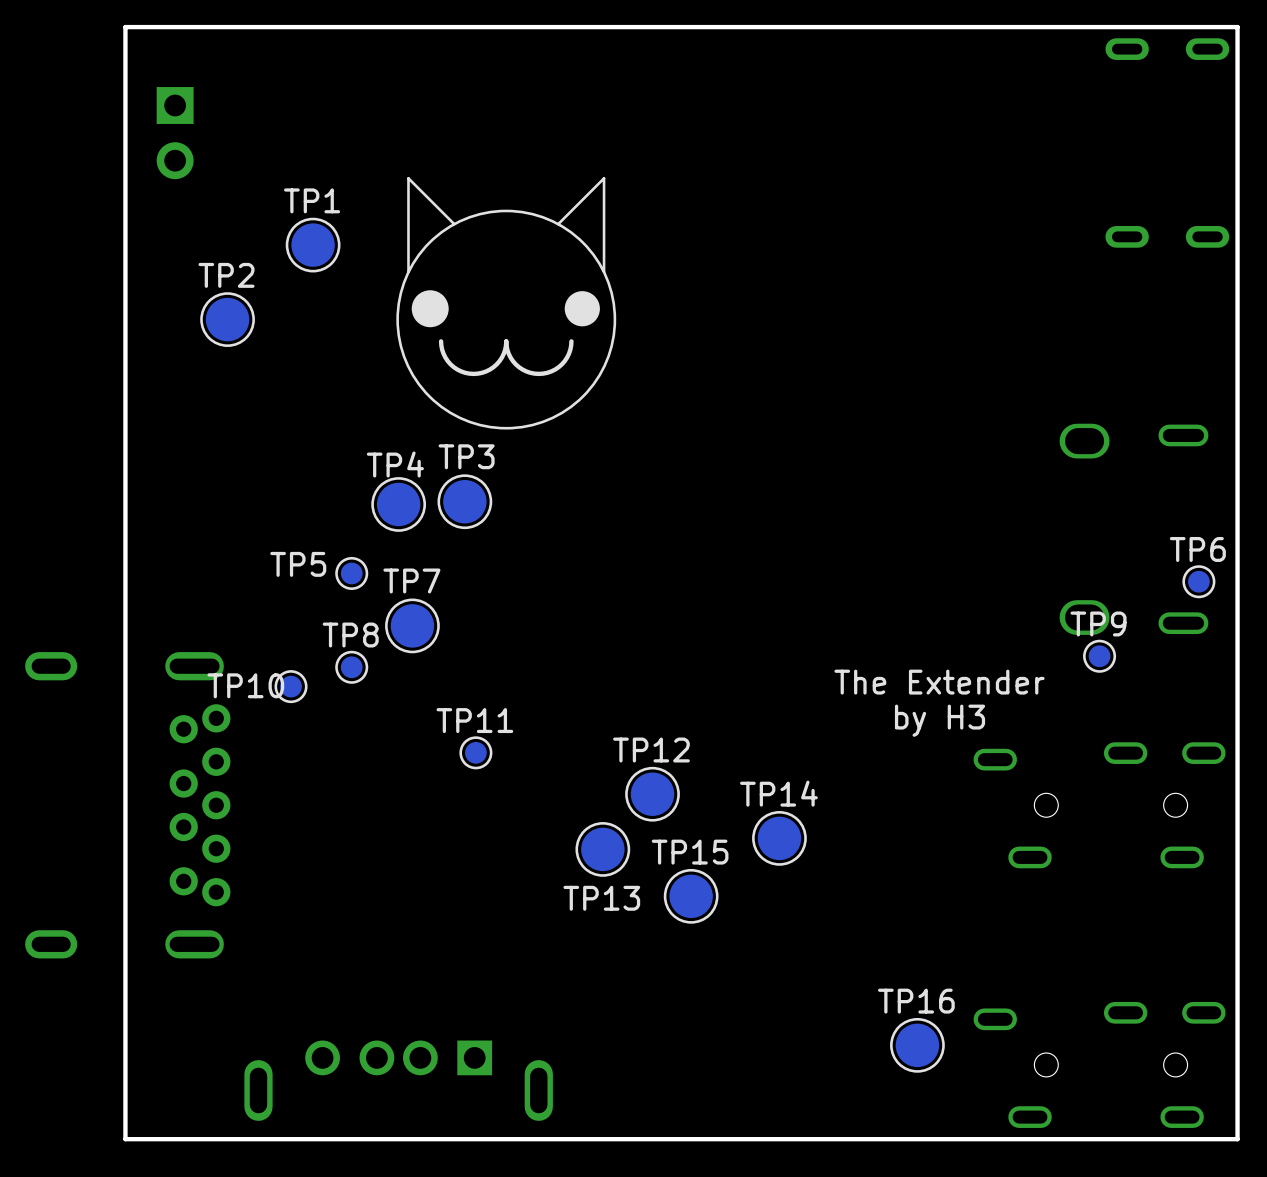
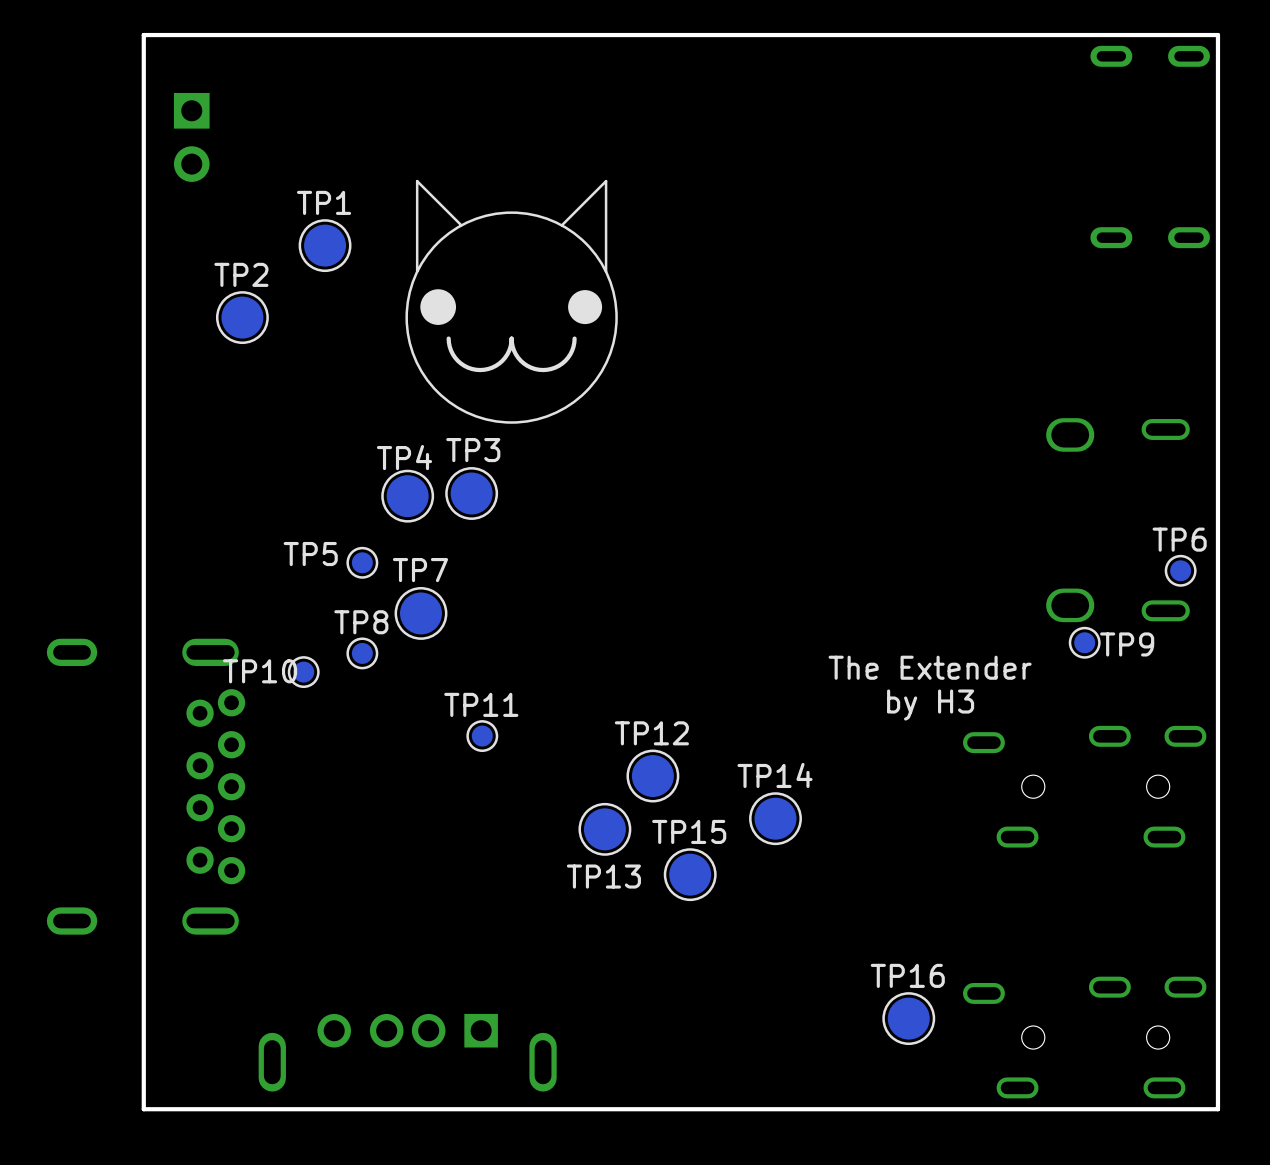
TP9 name position: TP9 (1098, 623) -> TP9 (1127, 644)

